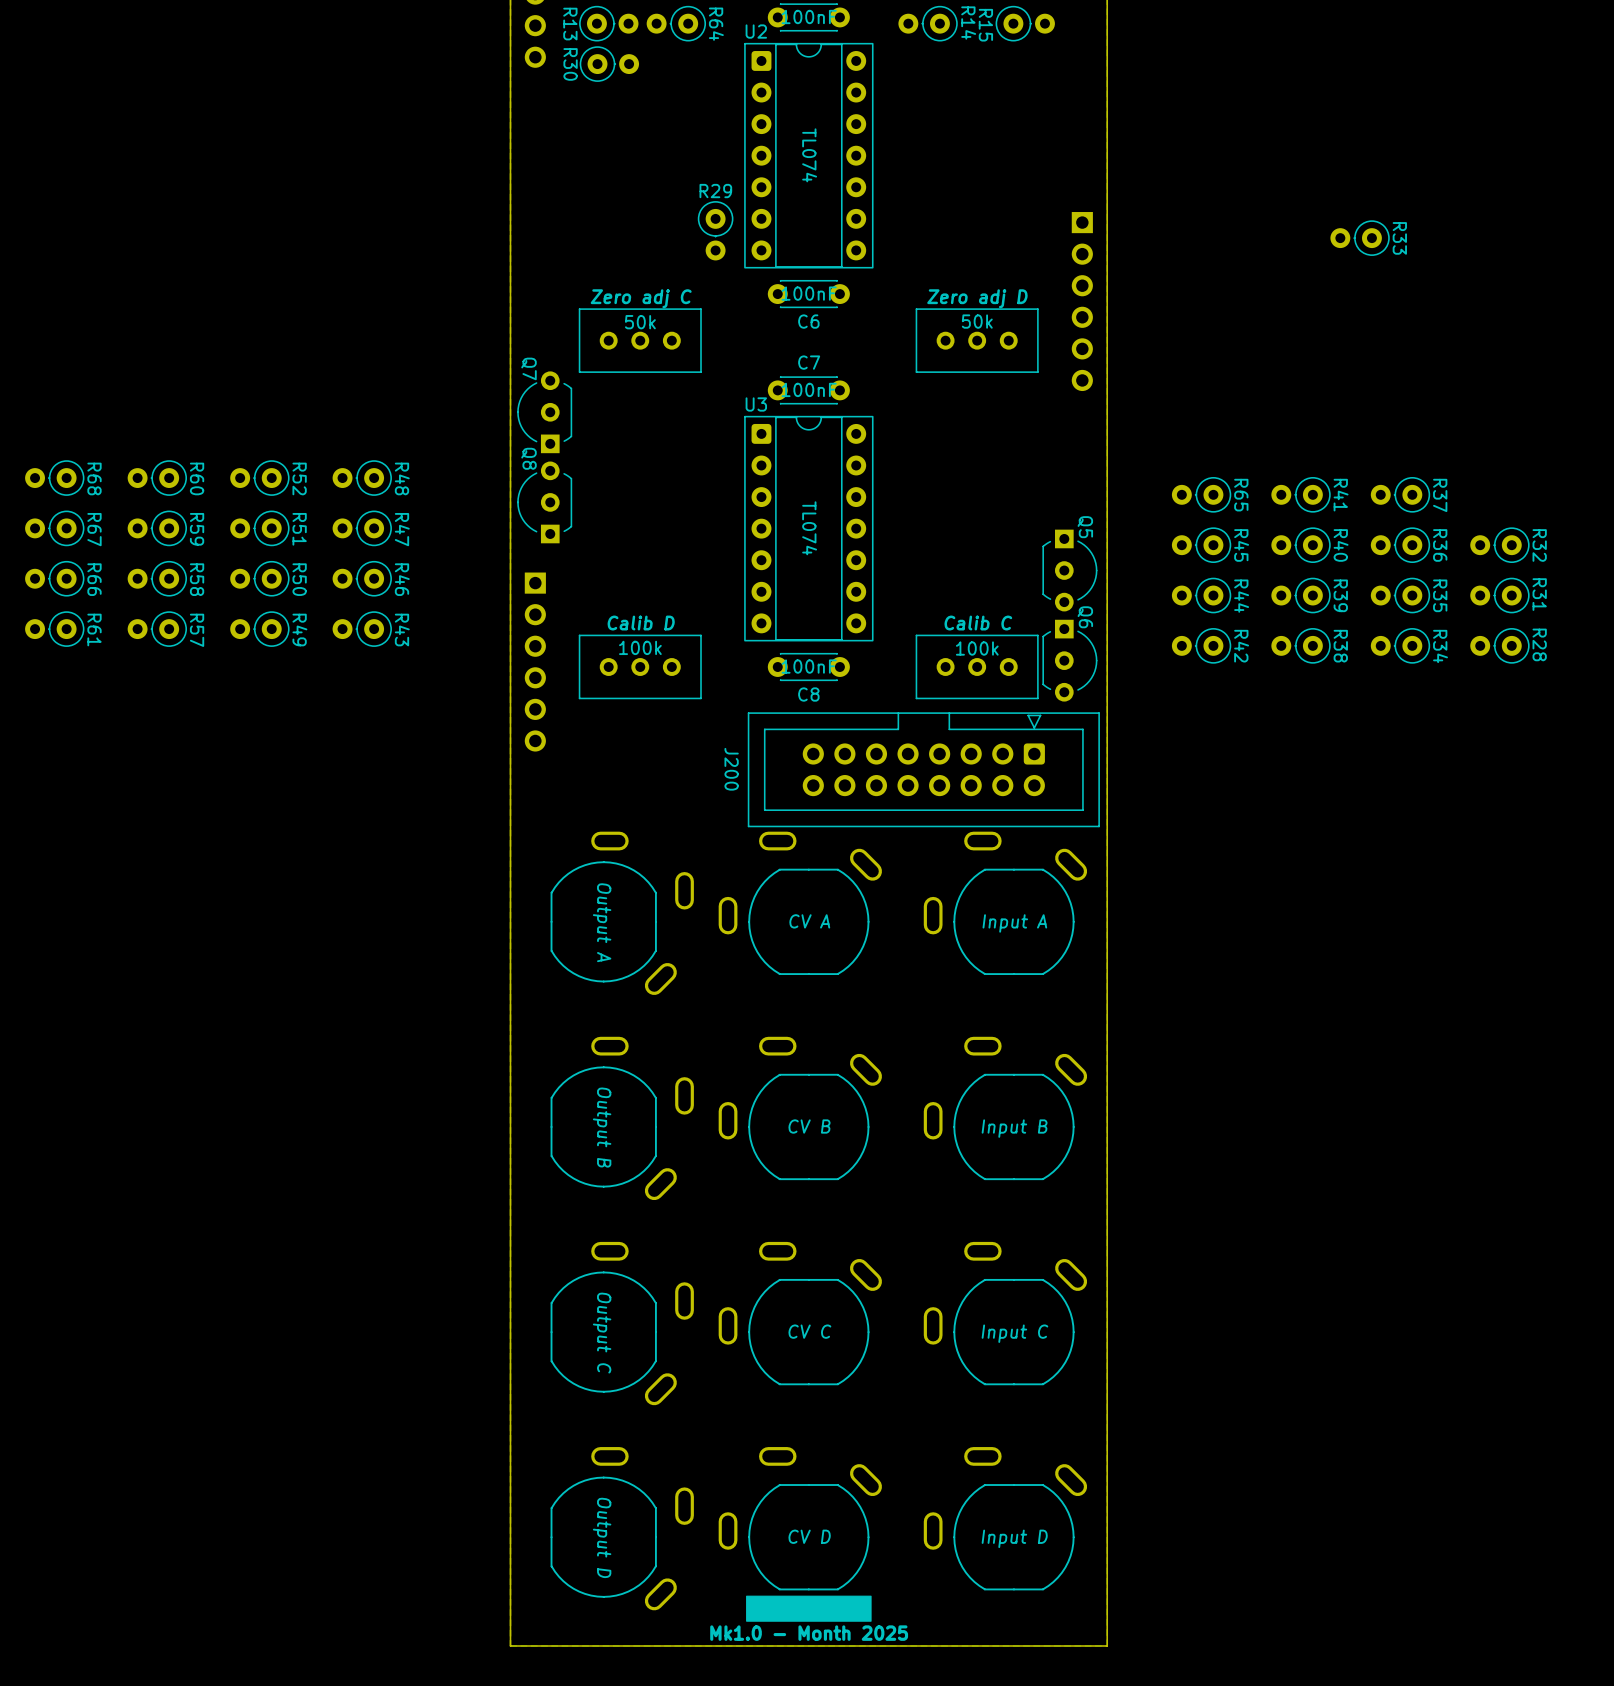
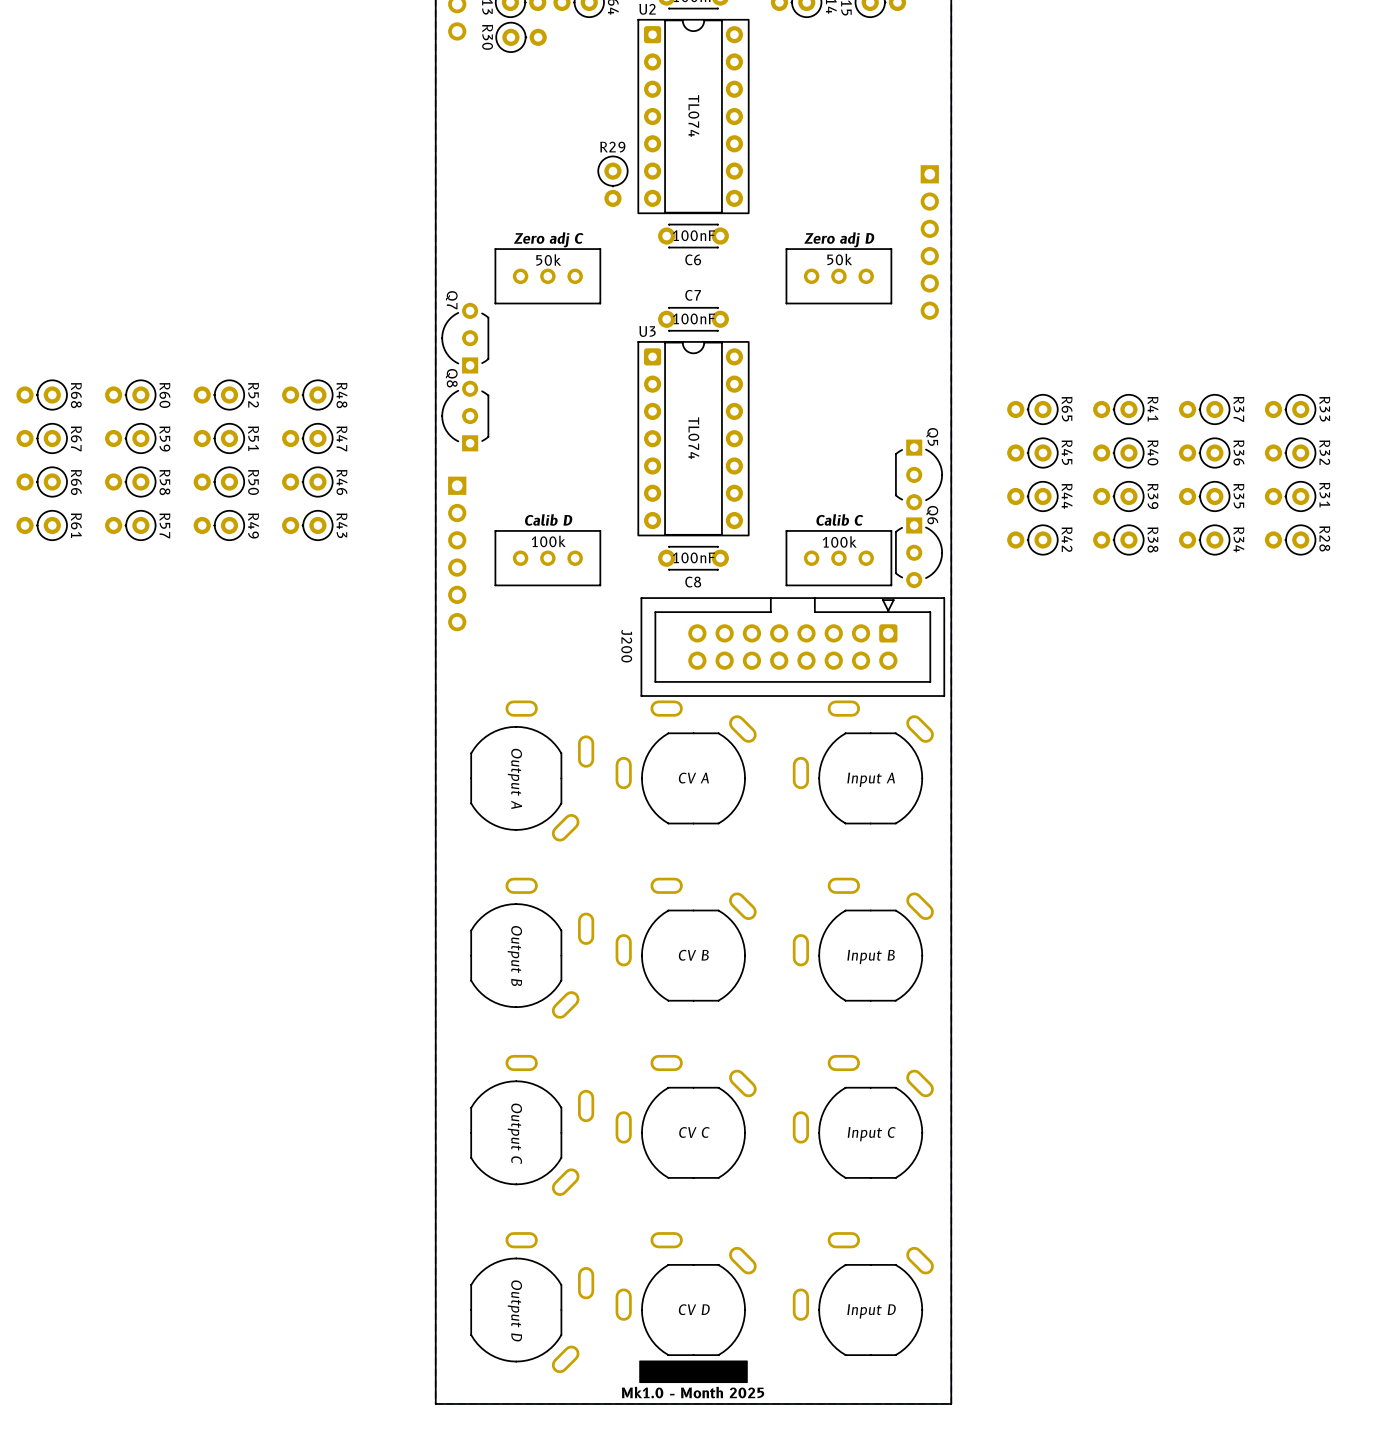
R33 position: (1360, 238) -> (1290, 409)

